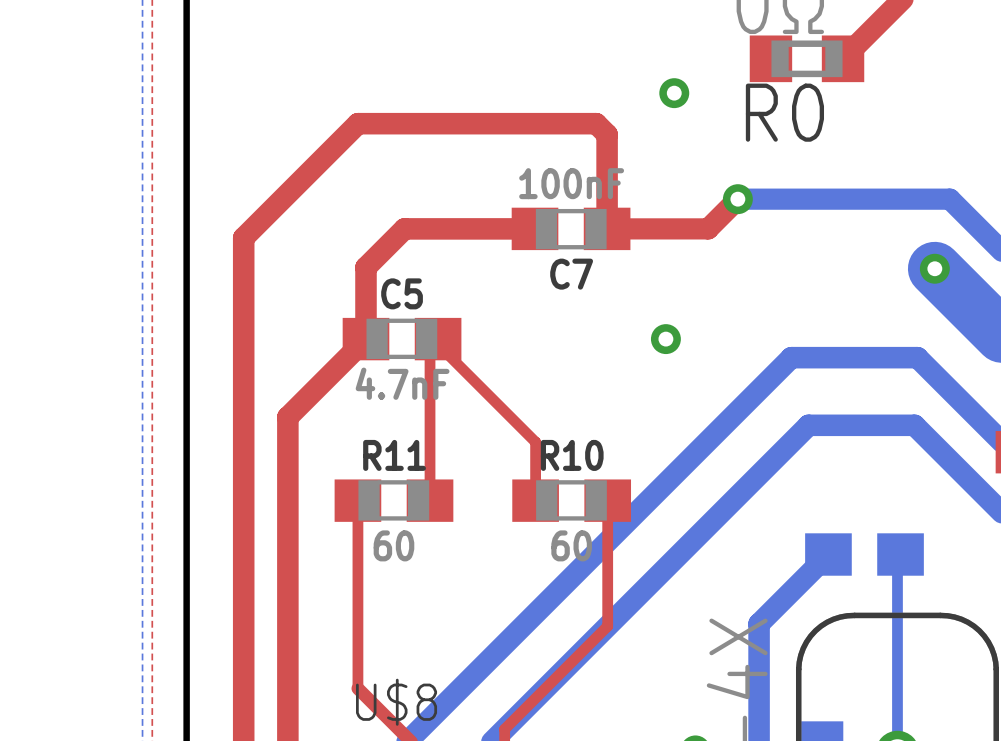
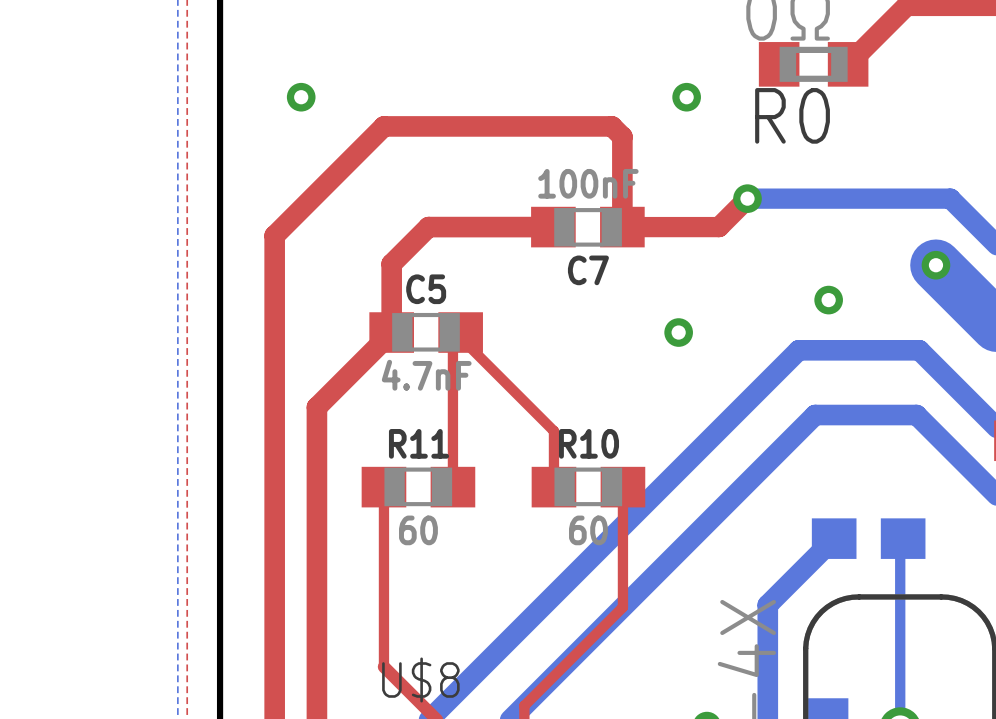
via: none -> (301, 97)
via: none -> (828, 300)

